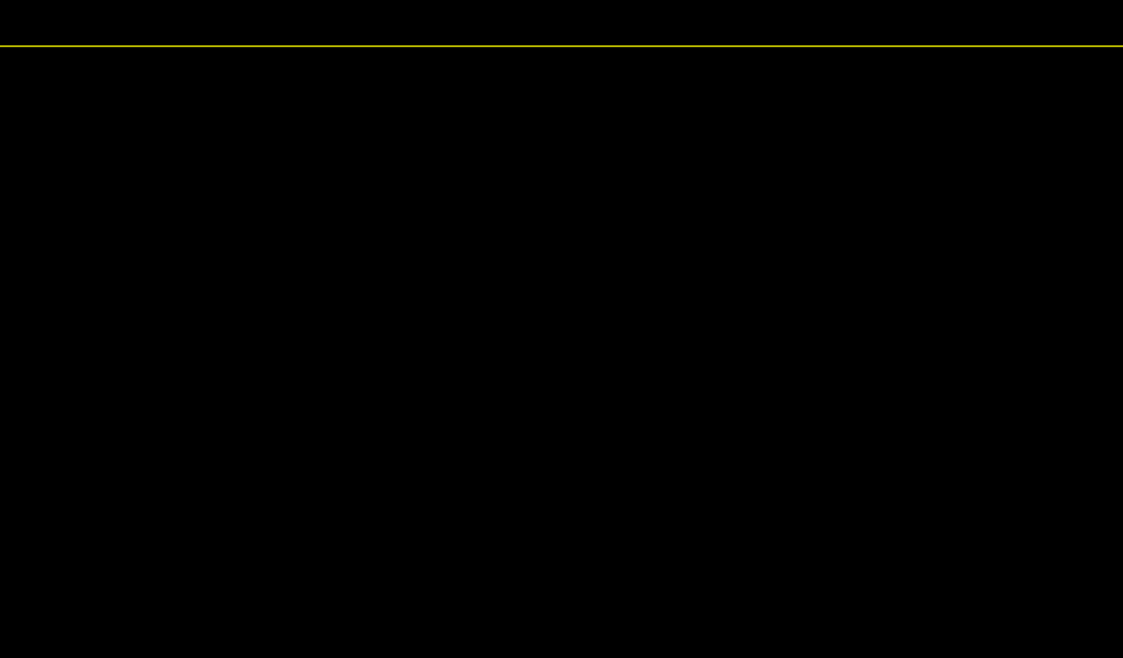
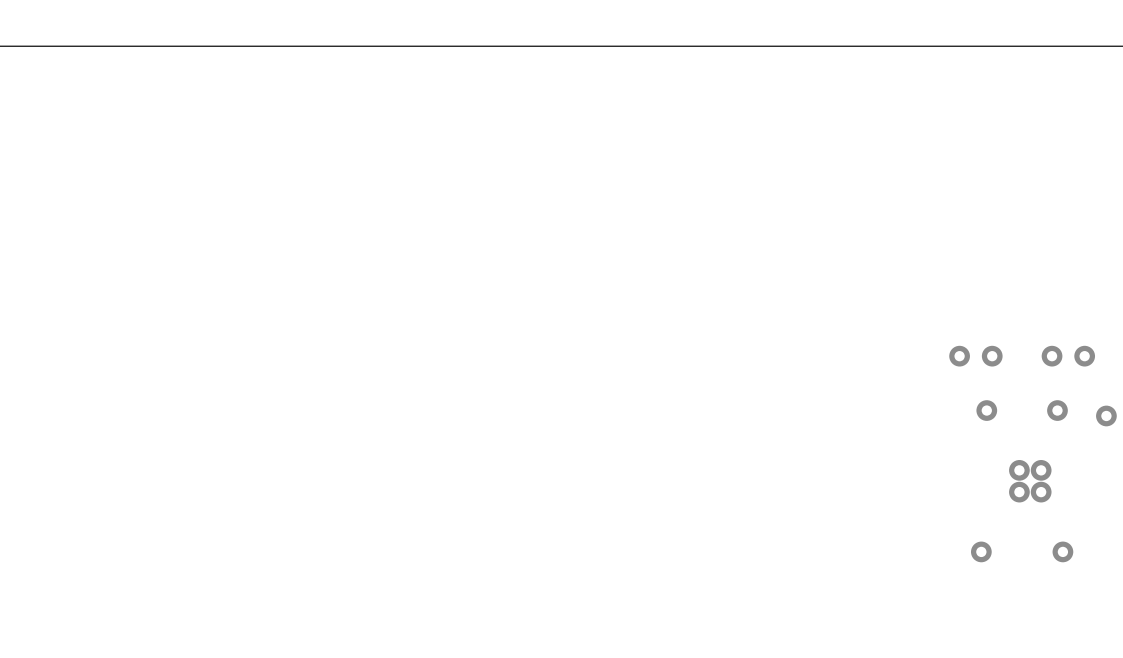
via: none -> (959, 356)
via: none -> (992, 356)
via: none -> (1052, 356)
via: none -> (1084, 356)
via: none -> (986, 410)
via: none -> (1057, 410)
via: none -> (1106, 415)
via: none -> (1019, 470)
via: none -> (1041, 470)
via: none -> (1019, 492)
via: none -> (1041, 492)
via: none -> (981, 551)
via: none -> (1062, 551)

